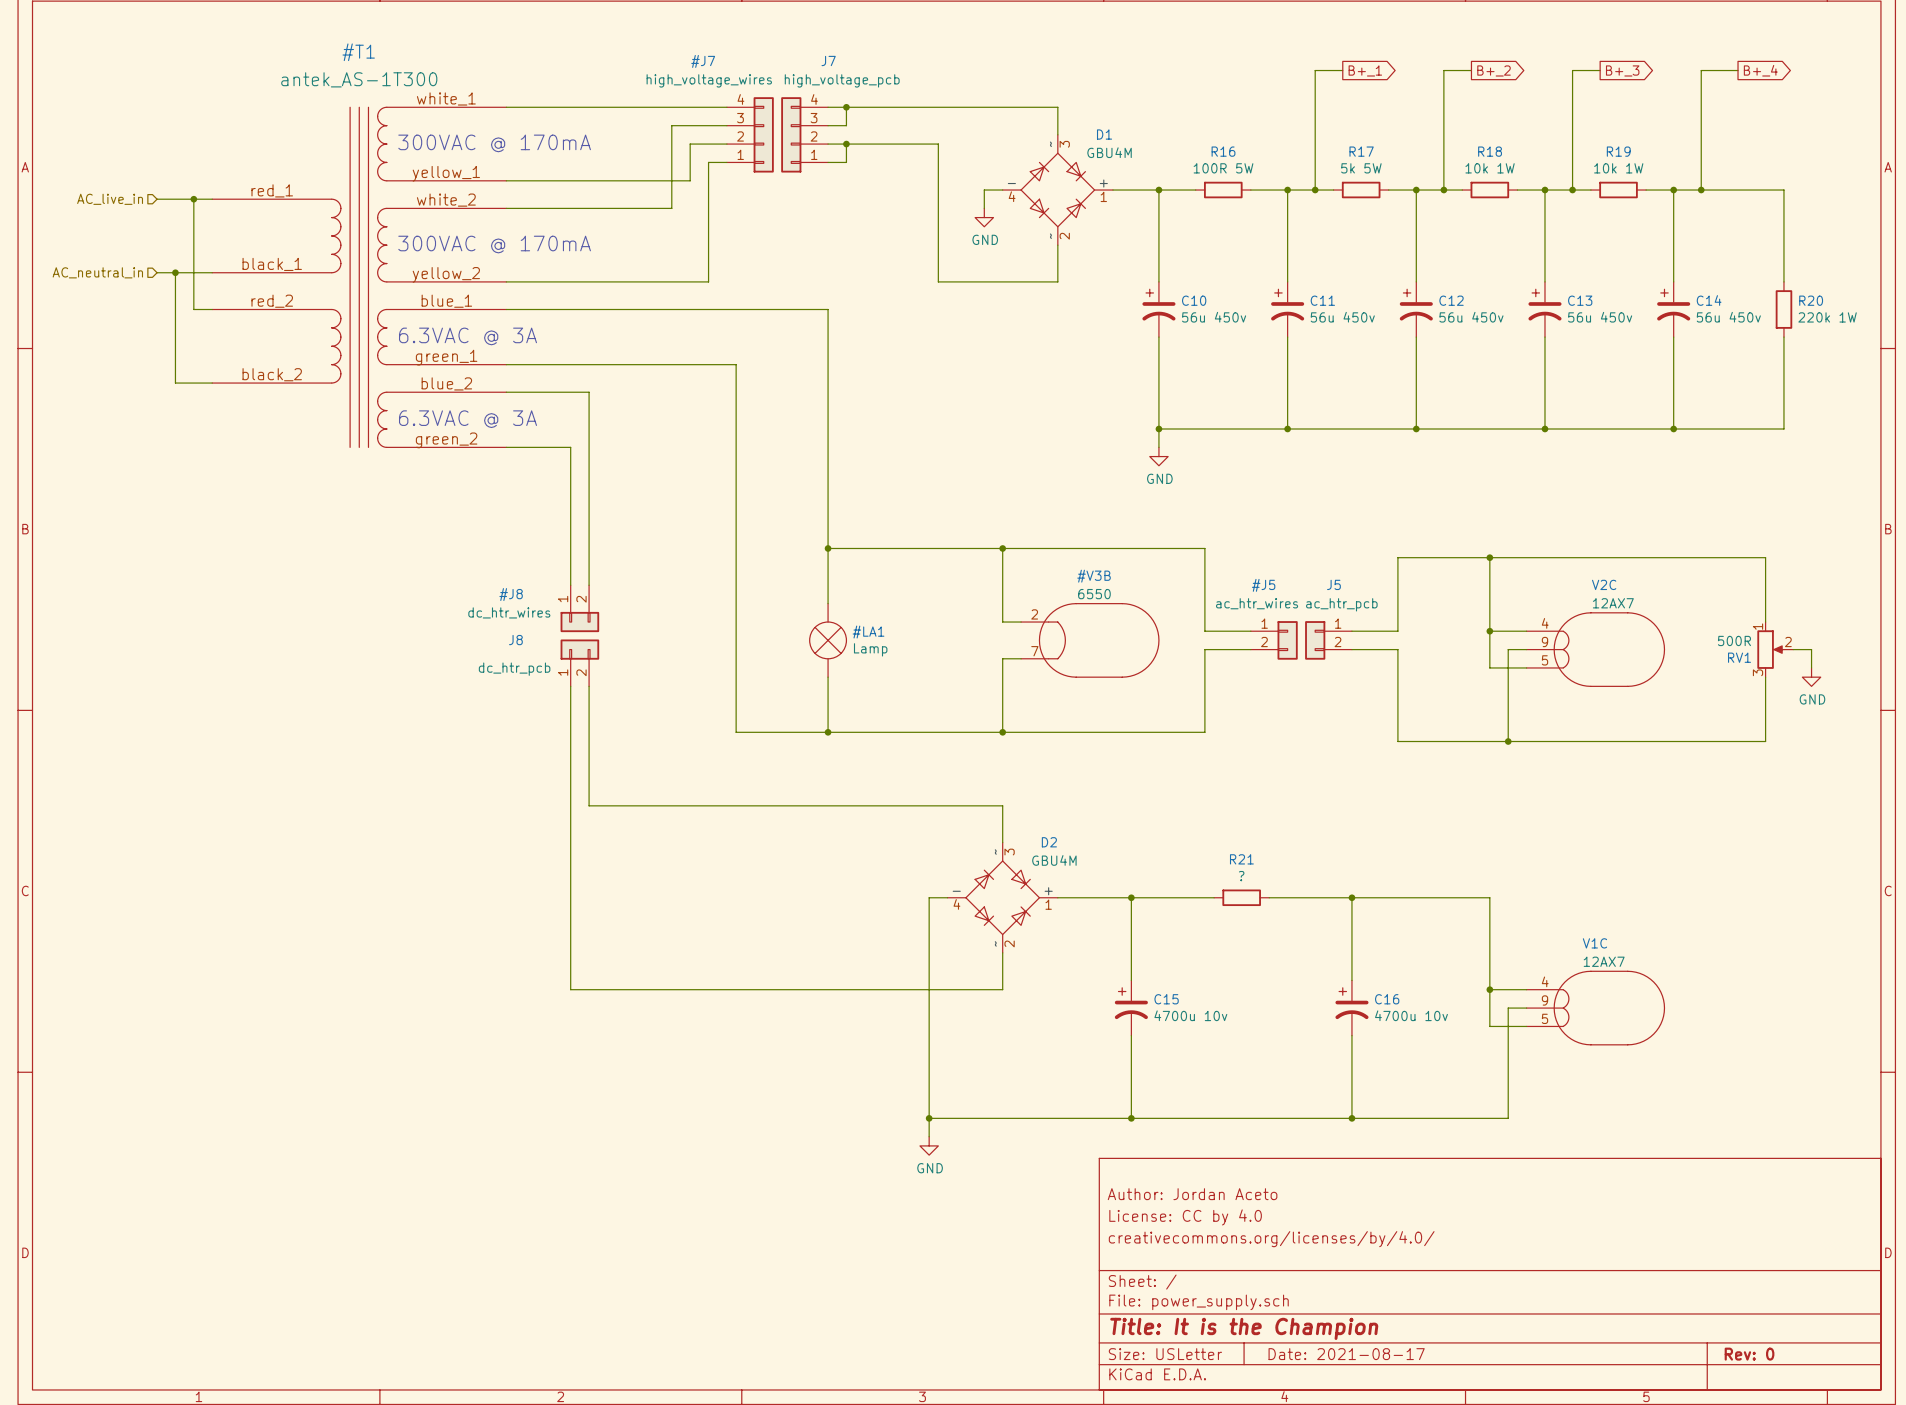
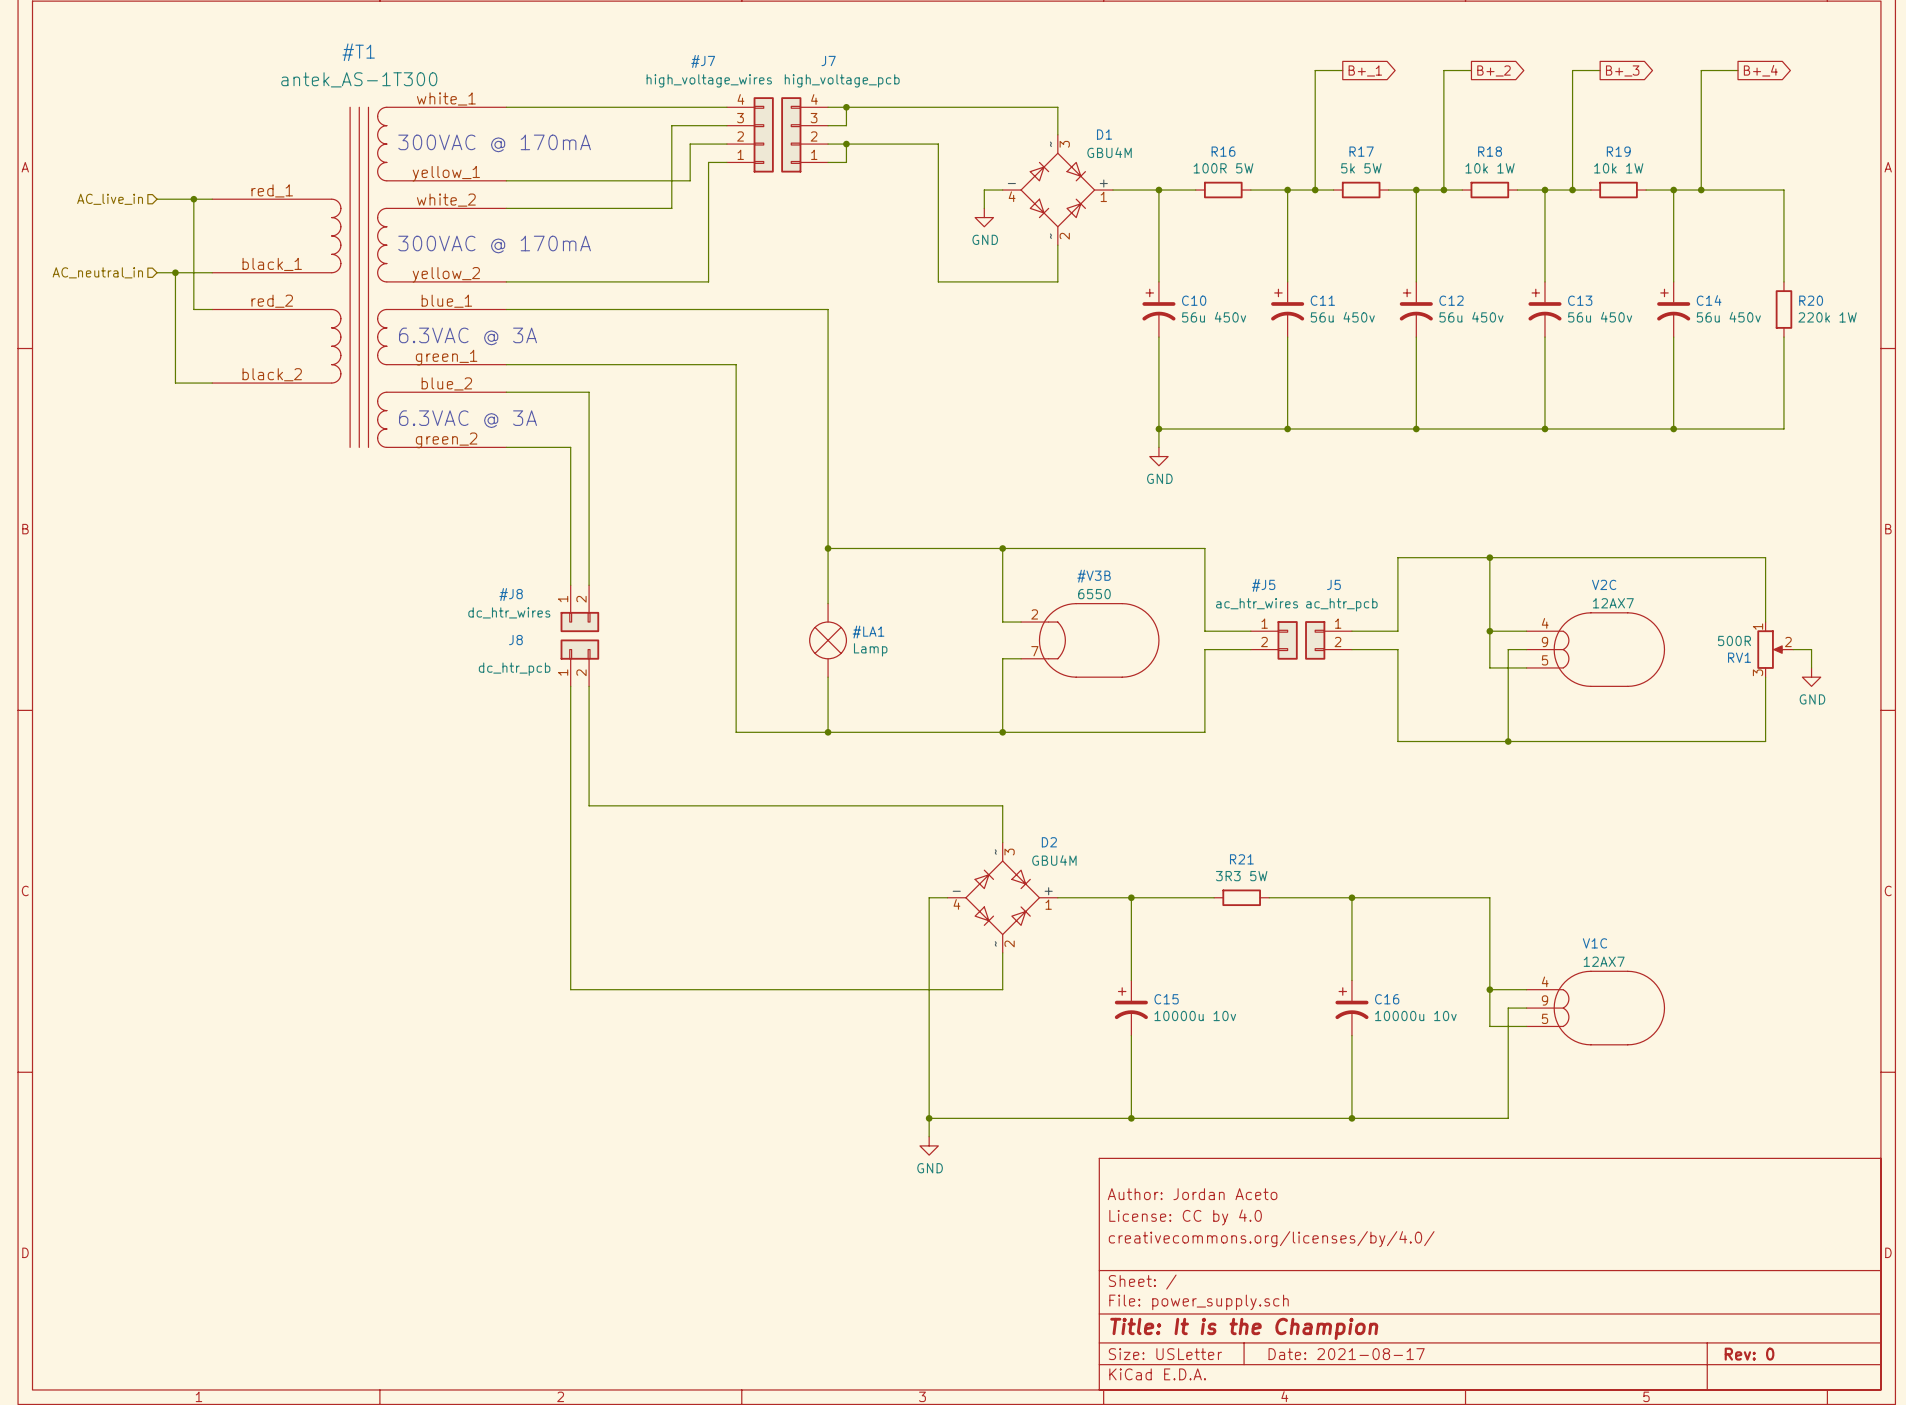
R21 value: ? (1241, 876) -> 3R3 5W (1241, 876)
C15 value: 4700u 10v (1190, 1015) -> 10000u 10v (1195, 1015)
C16 value: 4700u 10v (1411, 1015) -> 10000u 10v (1415, 1015)

